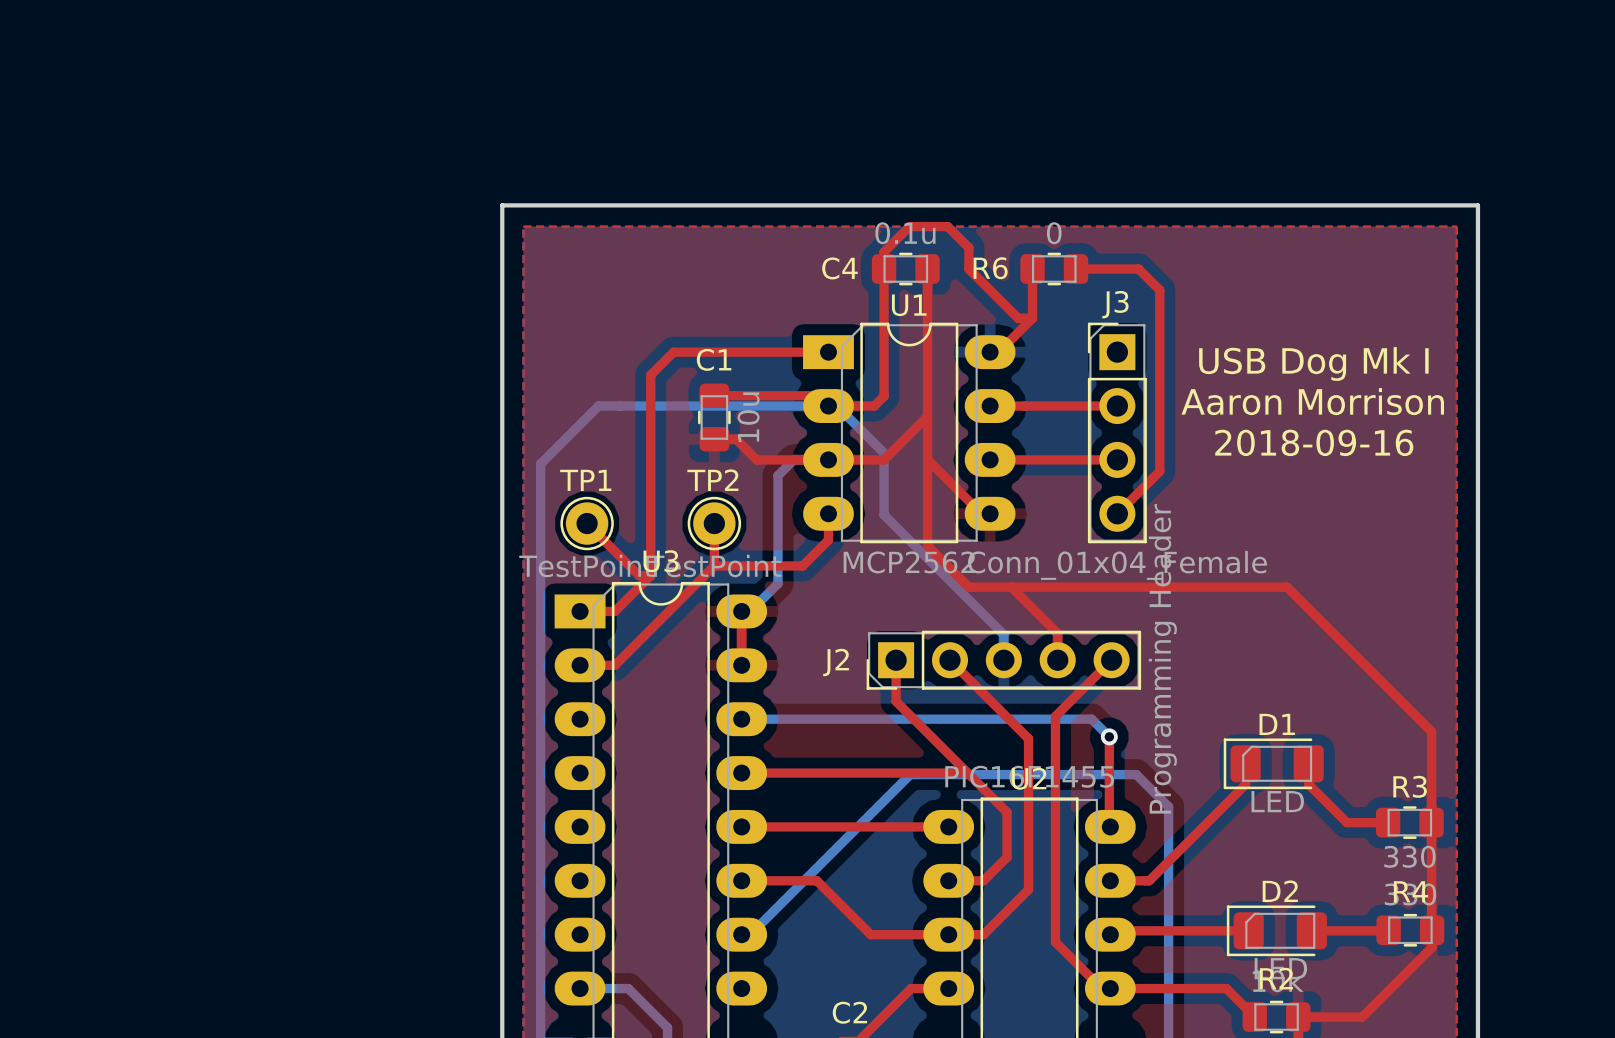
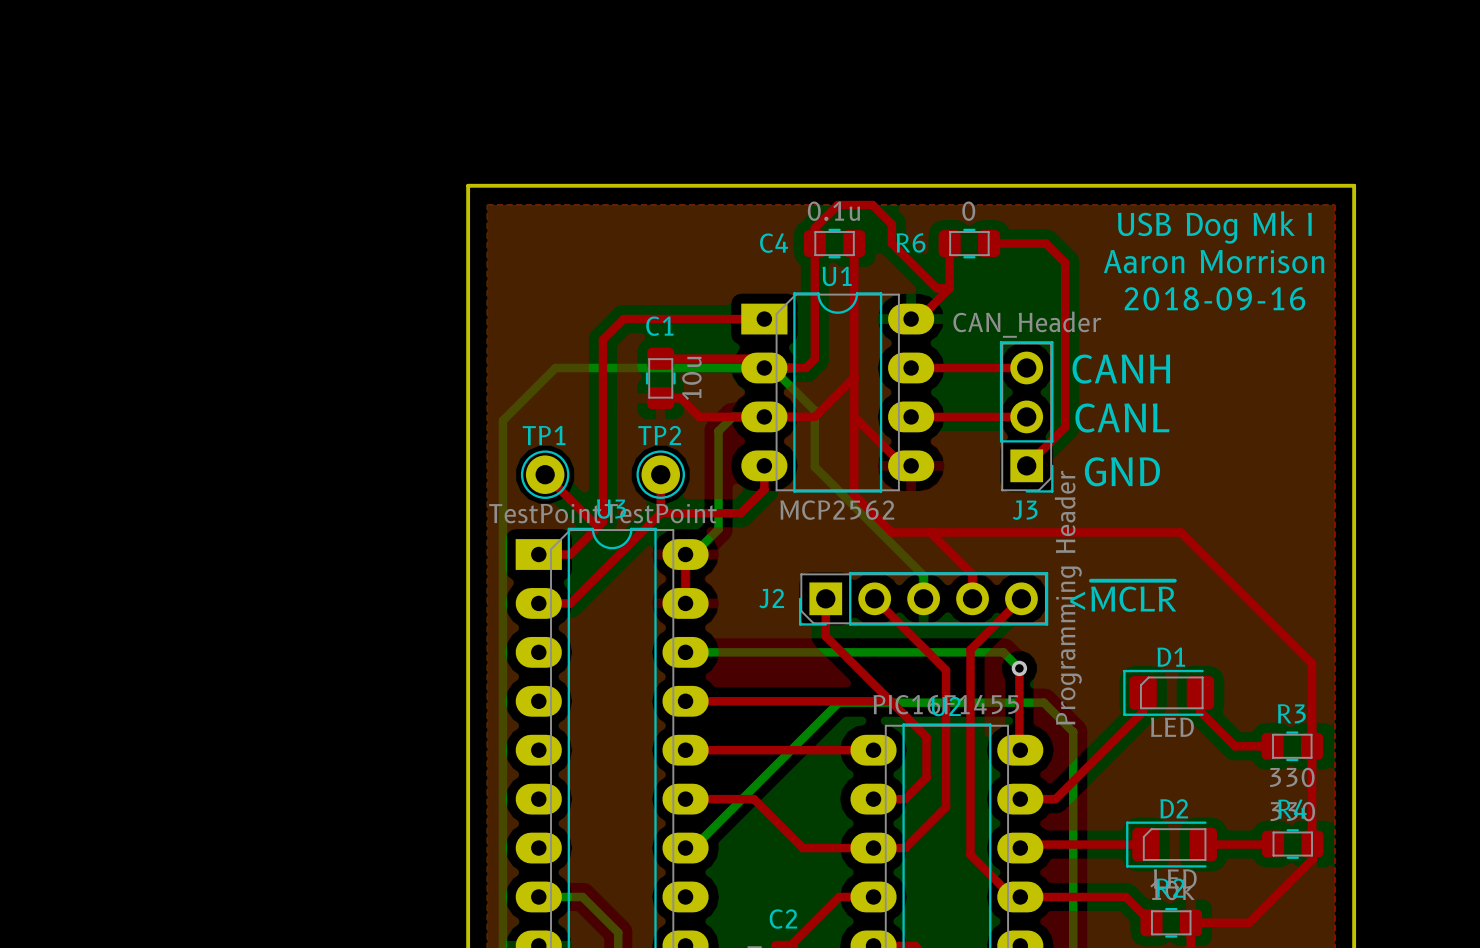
J3 name position: J3 (1115, 304) -> J3 (1025, 510)
J3 footprint: [1087, 322, 1147, 544] -> [999, 341, 1054, 493]
text position: USB Dog Mk I (1313, 364) -> USB Dog Mk I (1214, 227)
text position: Aaron Morrison (1312, 401) -> Aaron Morrison (1214, 261)
text: none -> CANH (1121, 369)
text position: 2018-09-16 (1314, 442) -> 2018-09-16 (1214, 298)
text: none -> CANL (1122, 418)
text: none -> GND (1122, 471)
J3 value: Conn_01x04_Female (1117, 565) -> CAN_Header (1027, 324)
text: none -> <~{MCLR} (1123, 596)

